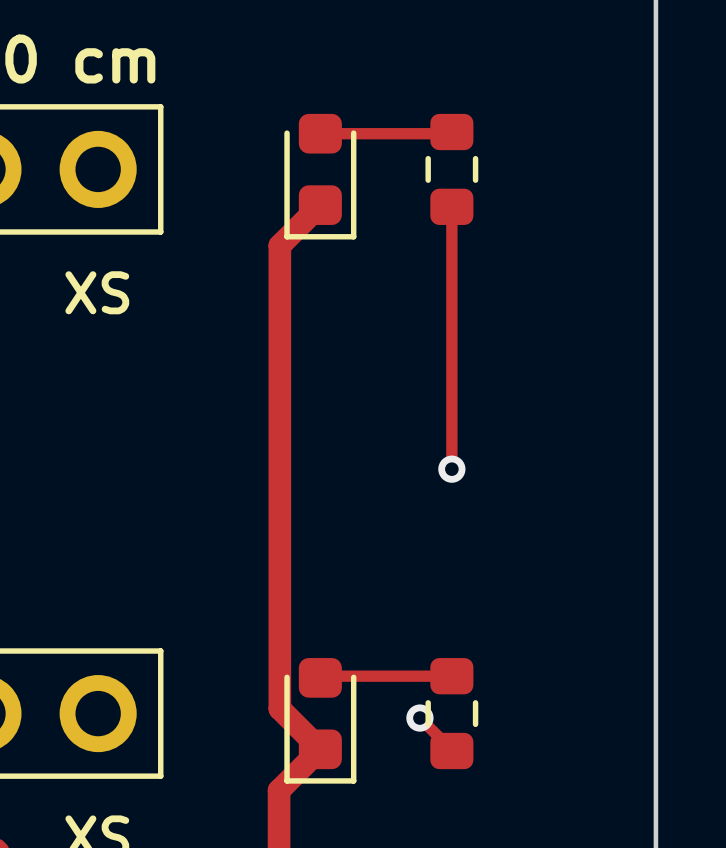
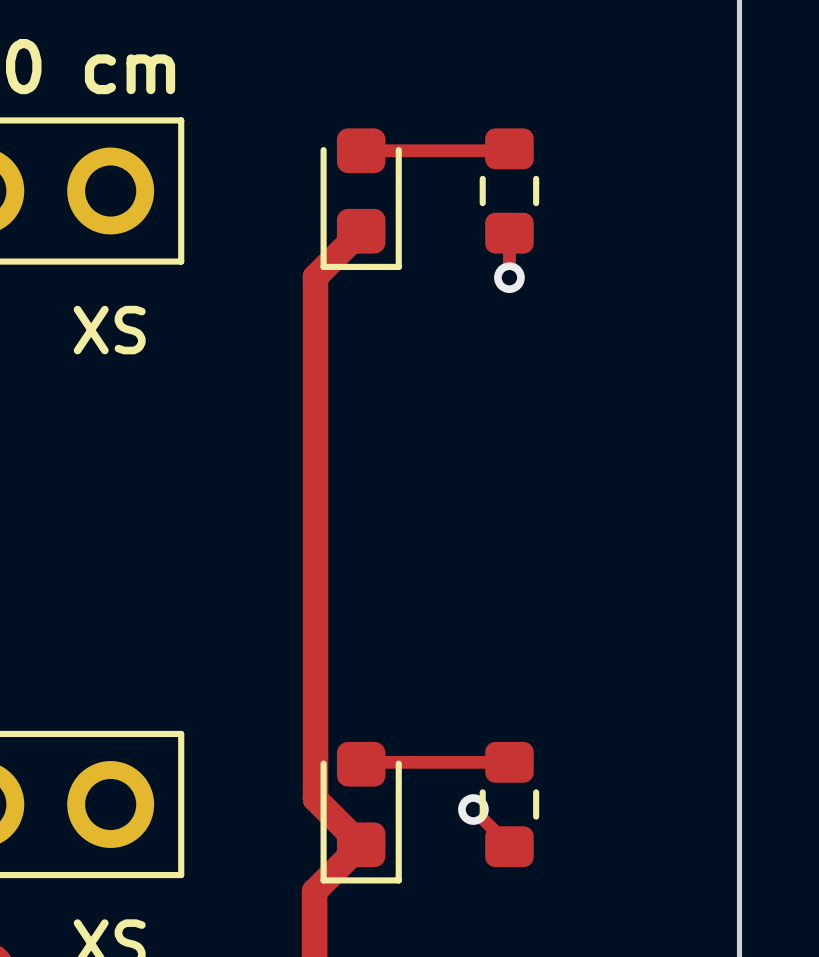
track: (451, 246) (451, 469) -> none
via position: (451, 469) -> (509, 277)

